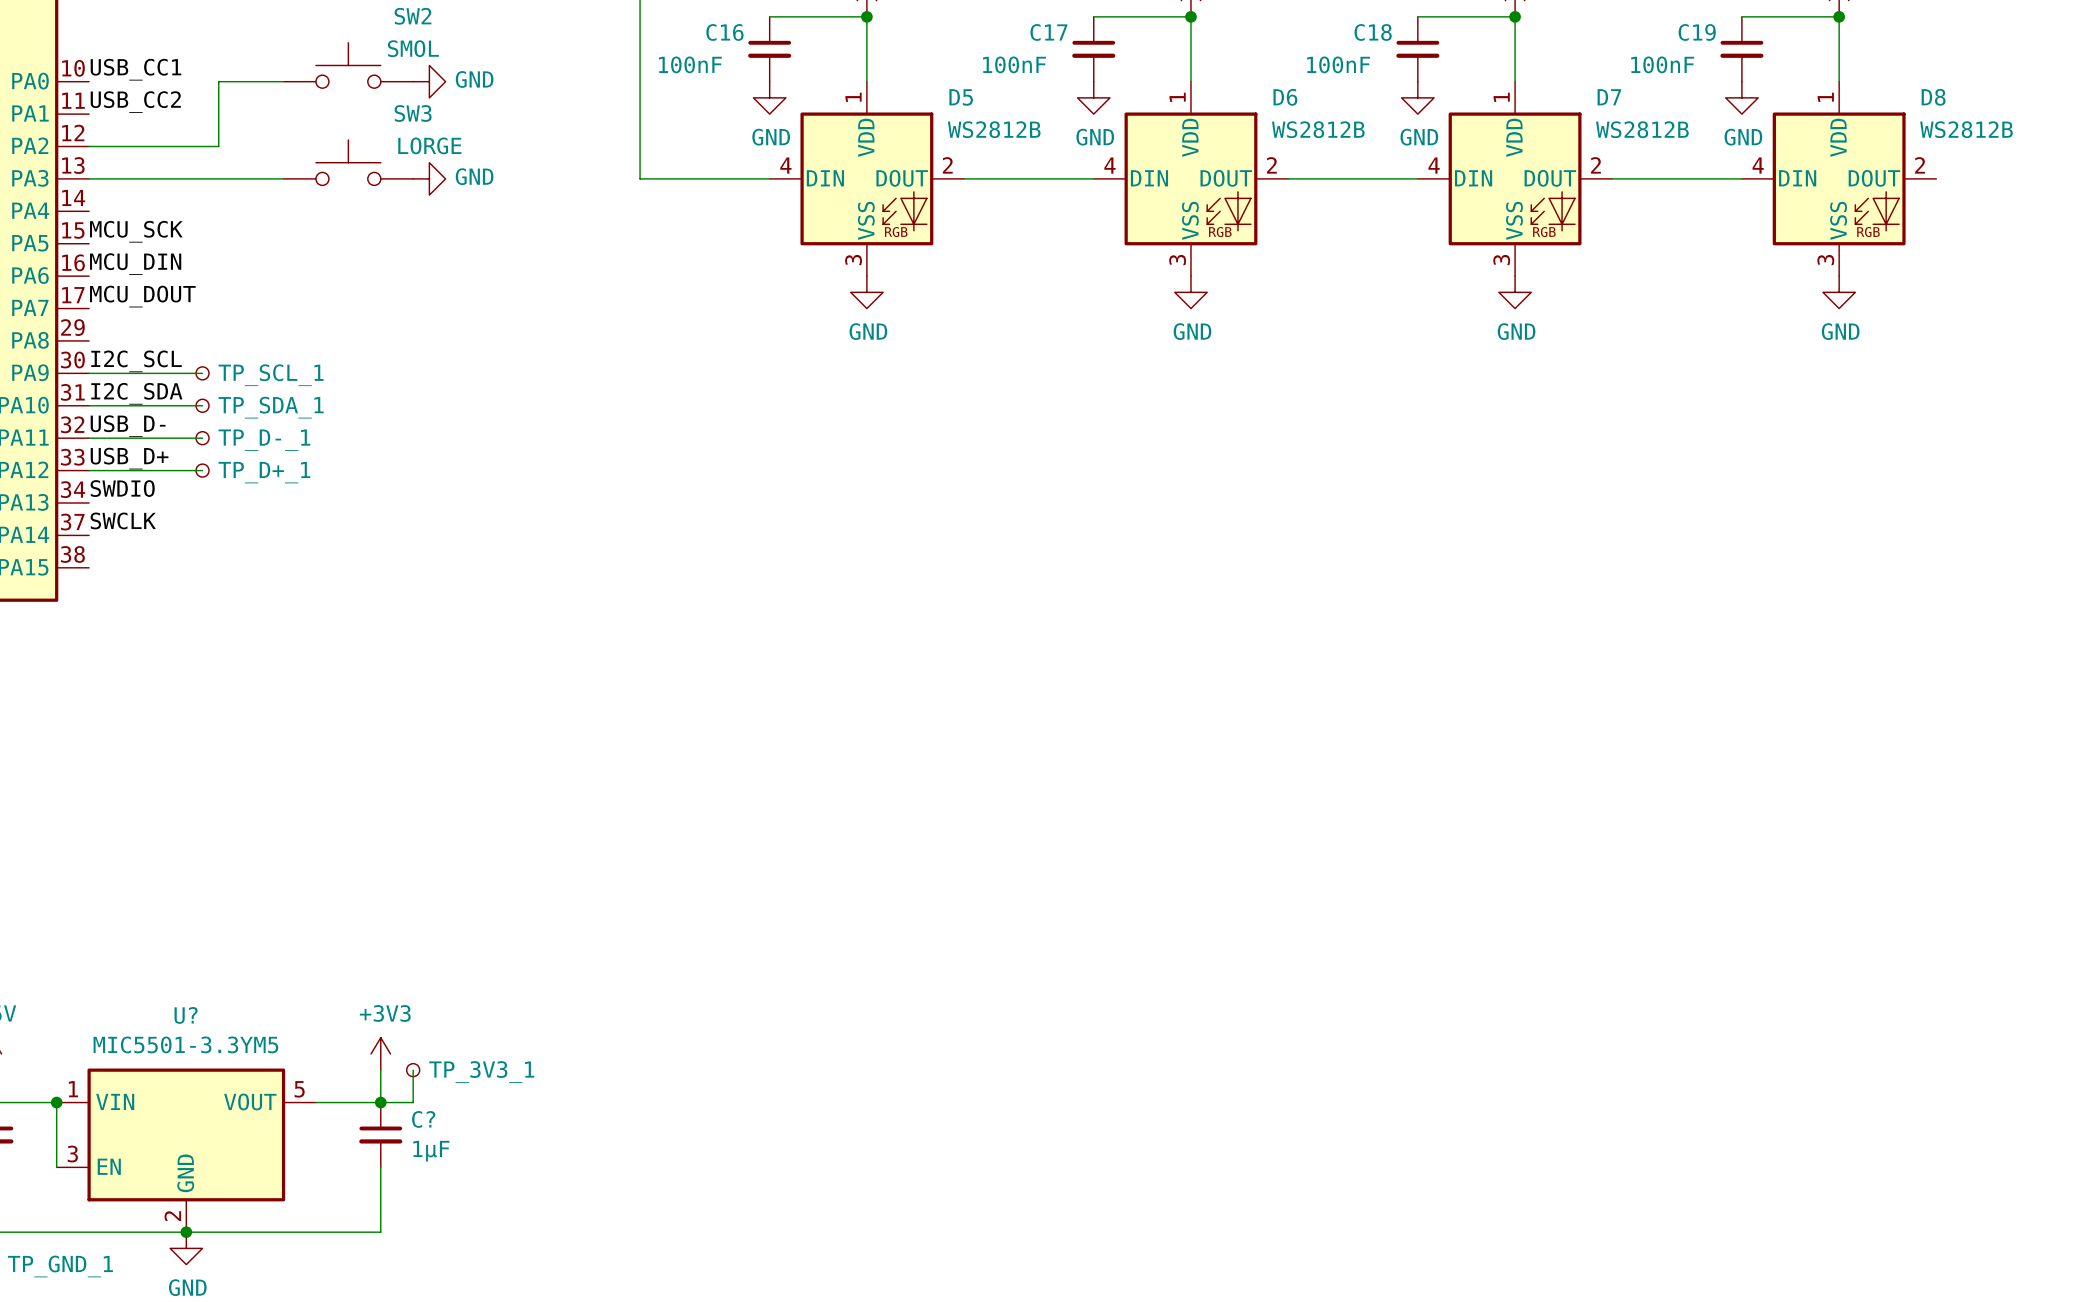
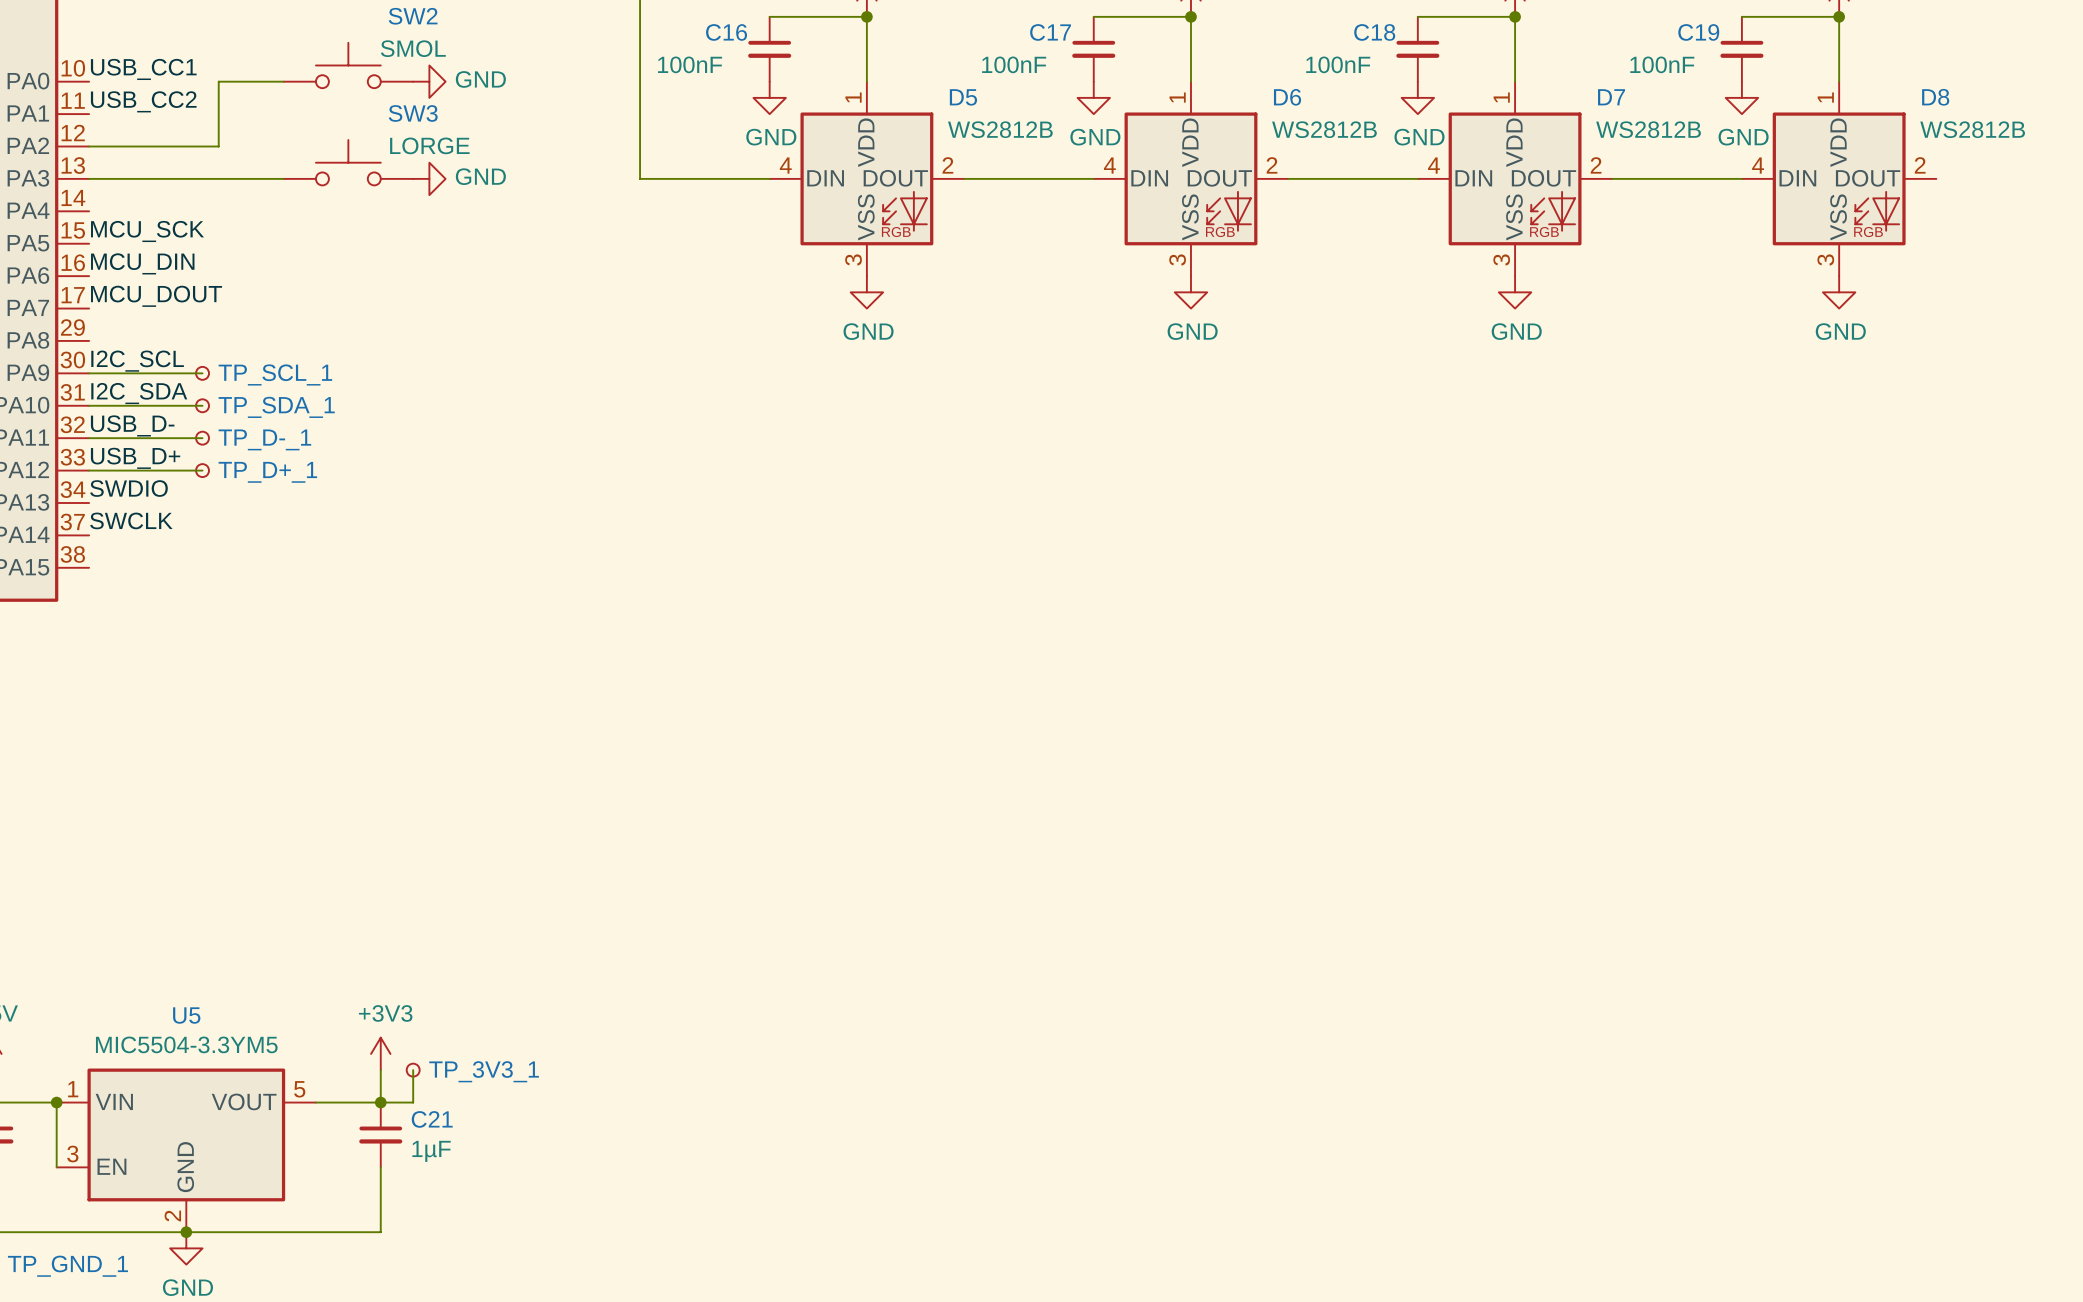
U? name: U? (186, 1015) -> U5 (186, 1015)
U? value: MIC5501-3.3YM5 (185, 1044) -> MIC5504-3.3YM5 (186, 1044)
C? name: C? (423, 1119) -> C21 (432, 1119)

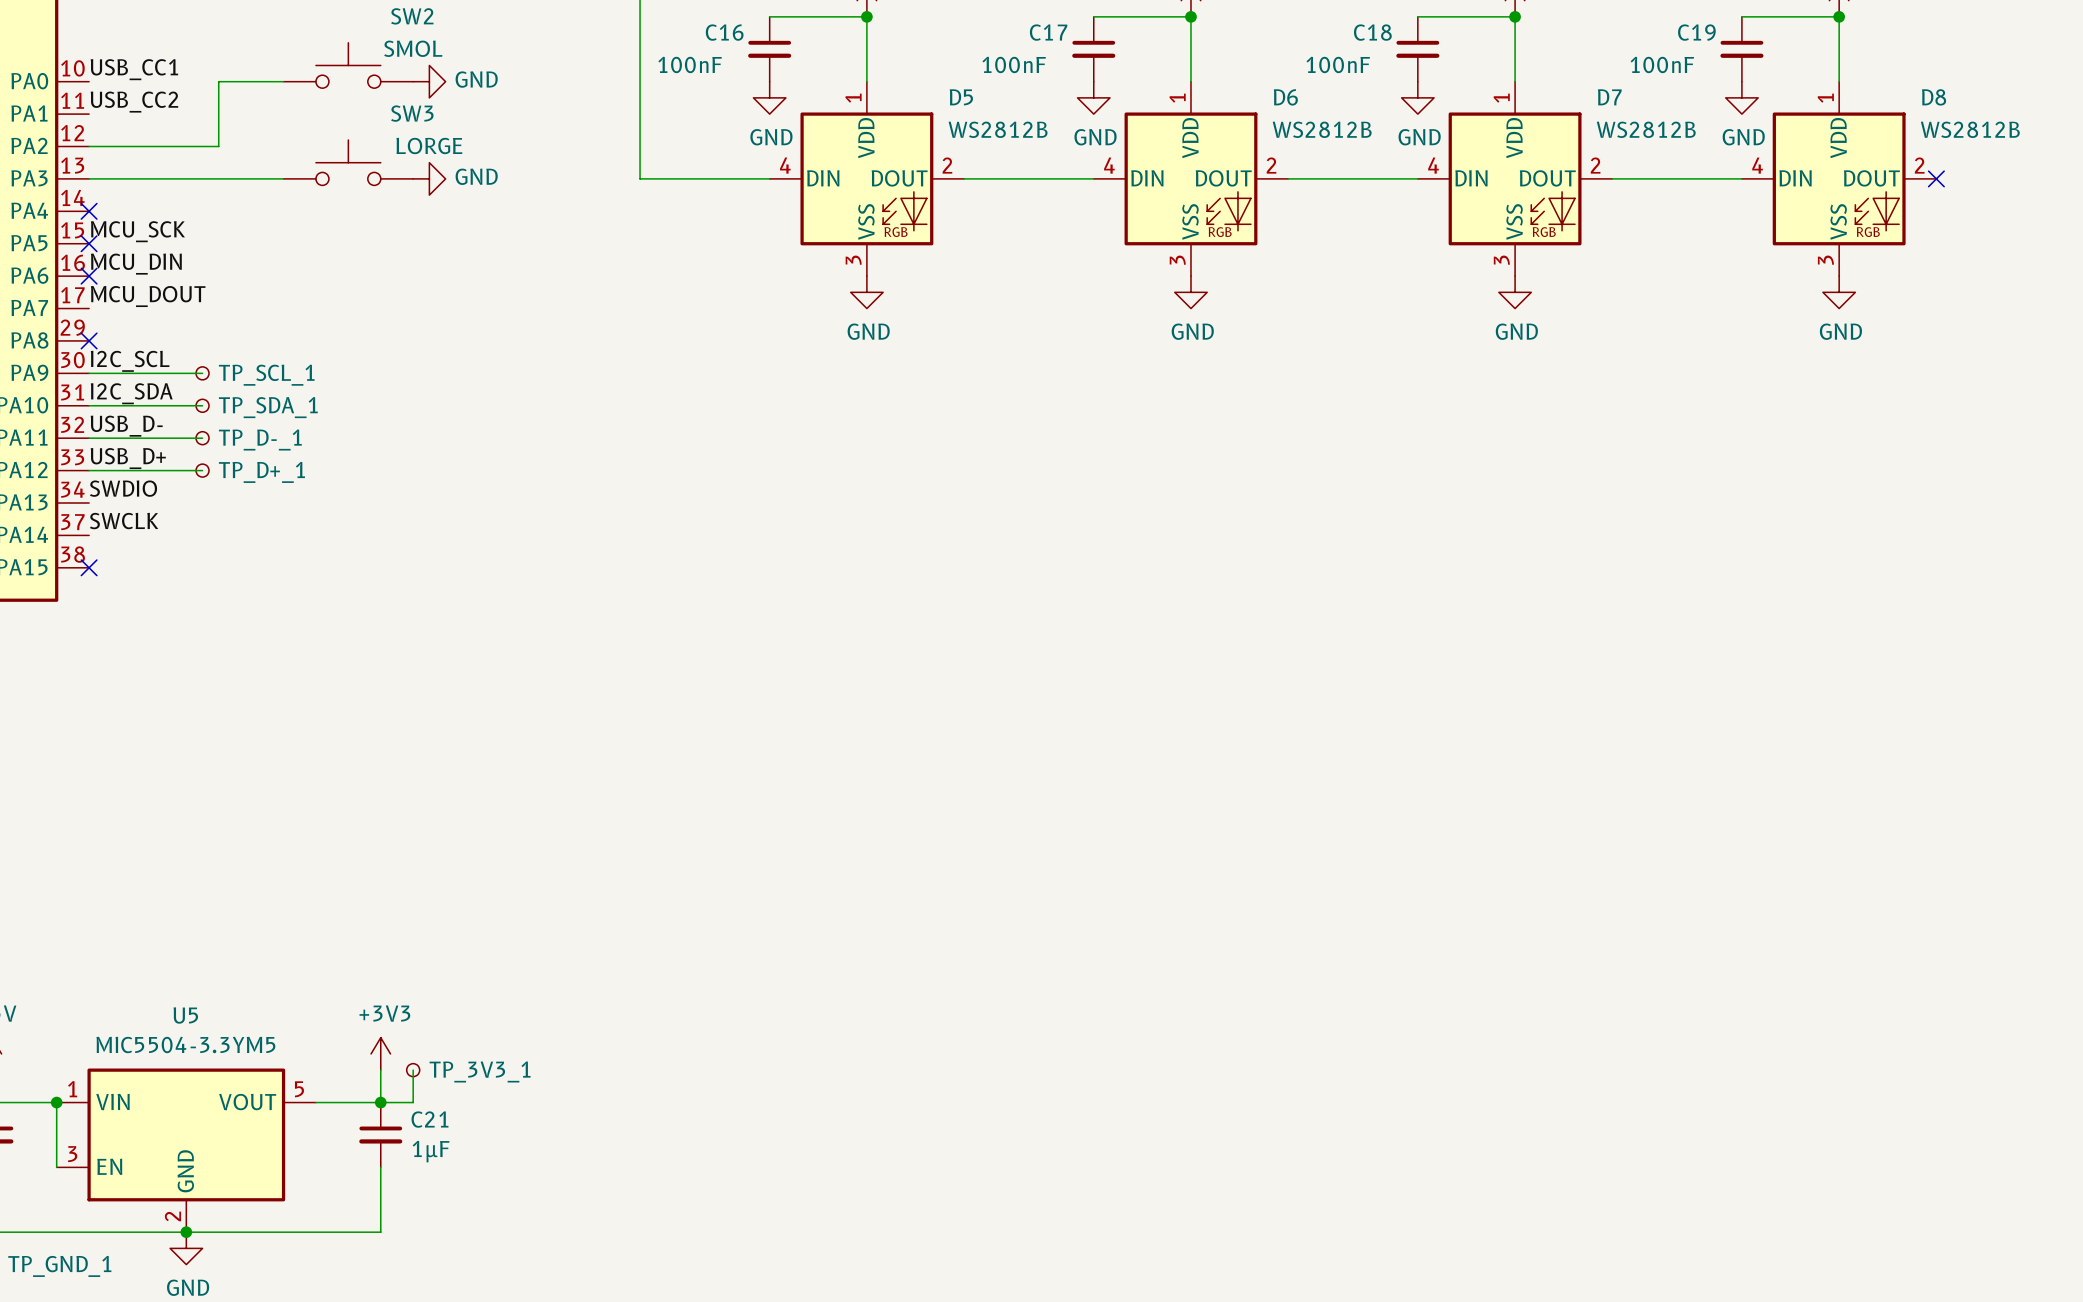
no-connect mark: none -> (1936, 178)
no-connect mark: none -> (89, 211)
no-connect mark: none -> (89, 243)
no-connect mark: none -> (89, 276)
no-connect mark: none -> (89, 340)
no-connect mark: none -> (89, 567)

